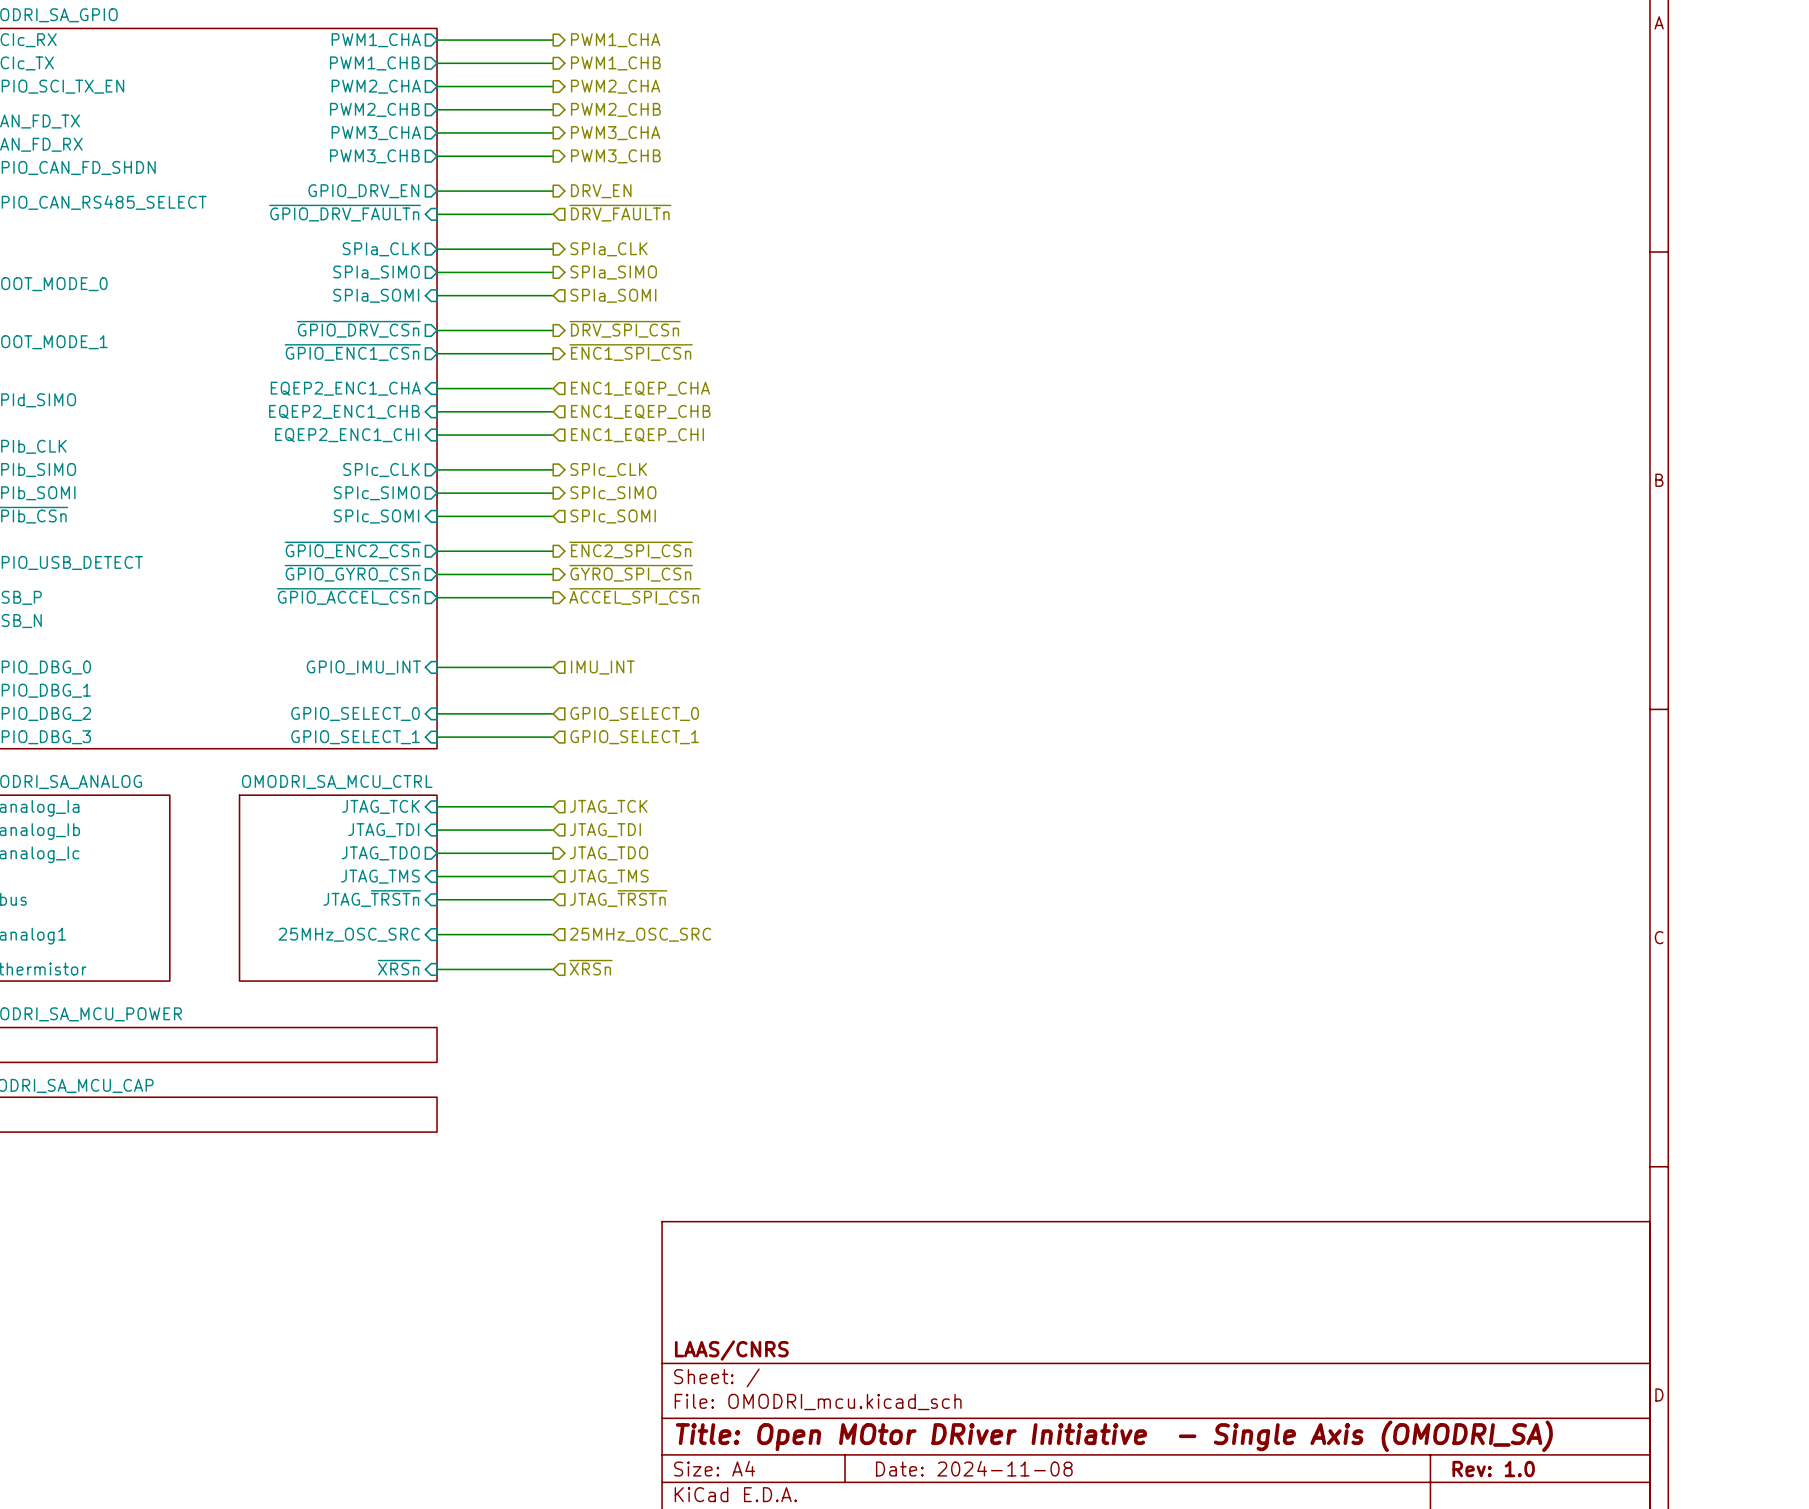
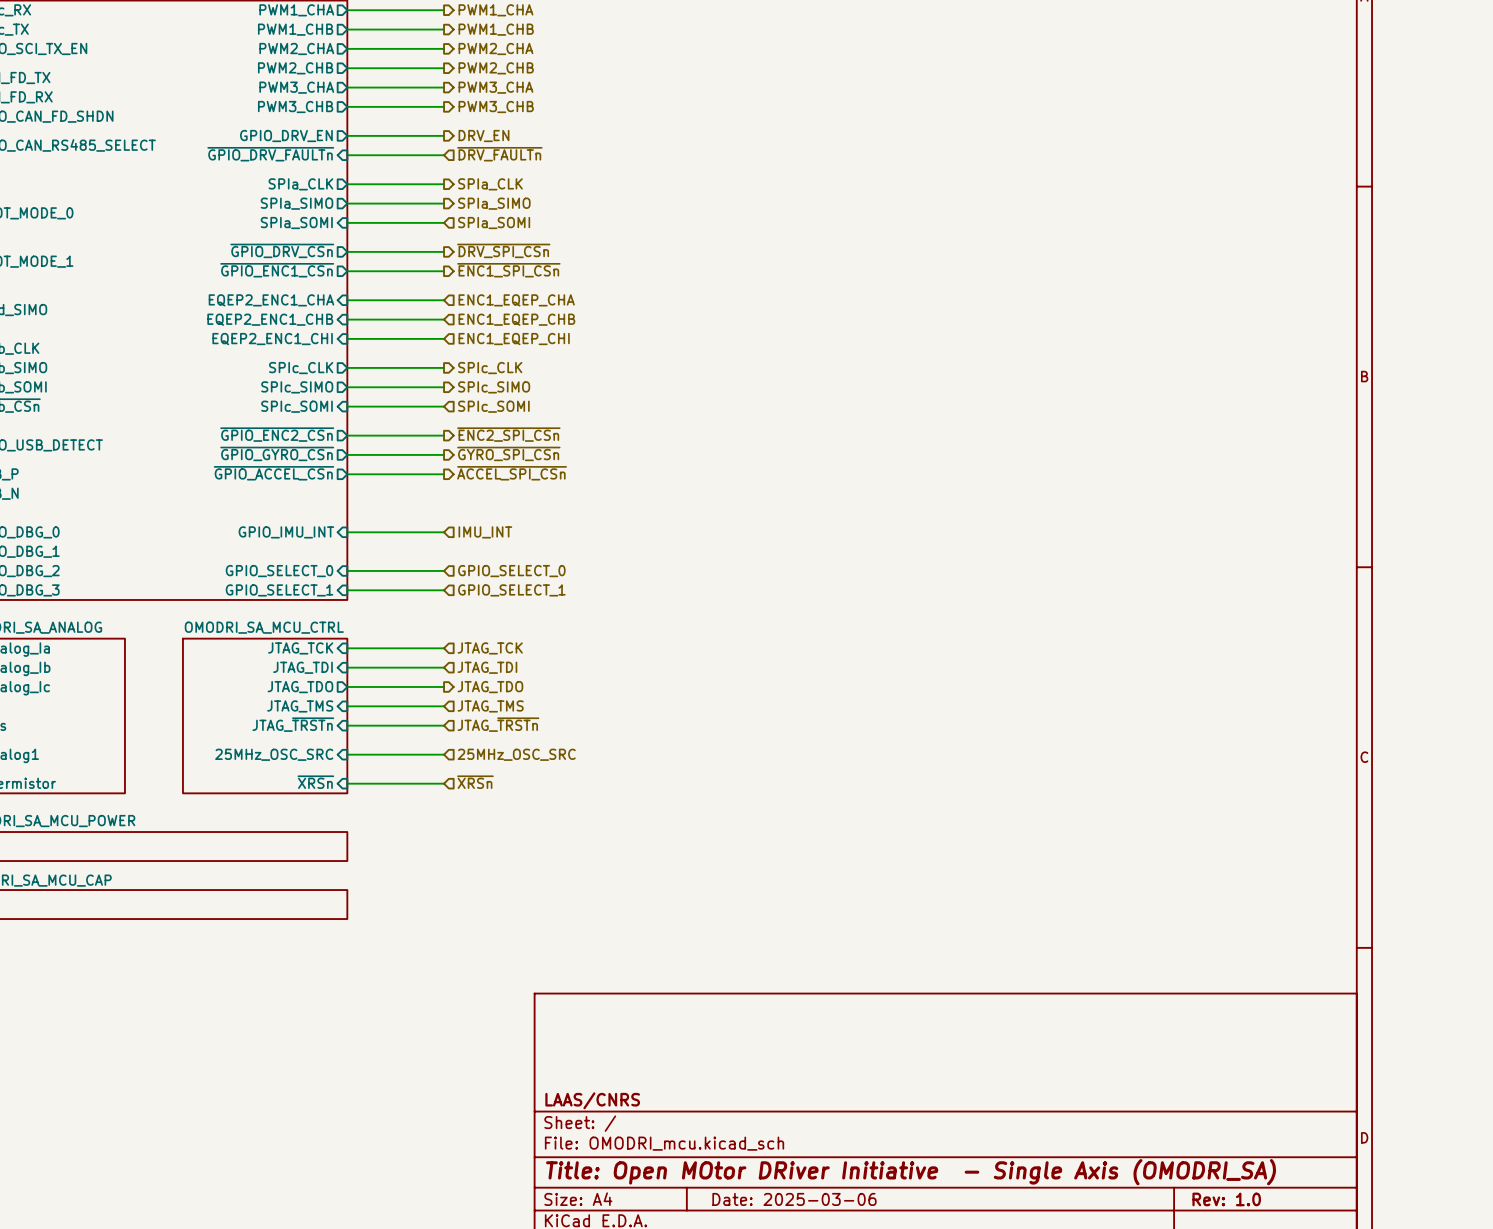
title block: Date: 2024-11-08 (974, 1468) -> Date: 2025-03-06 (794, 1199)

